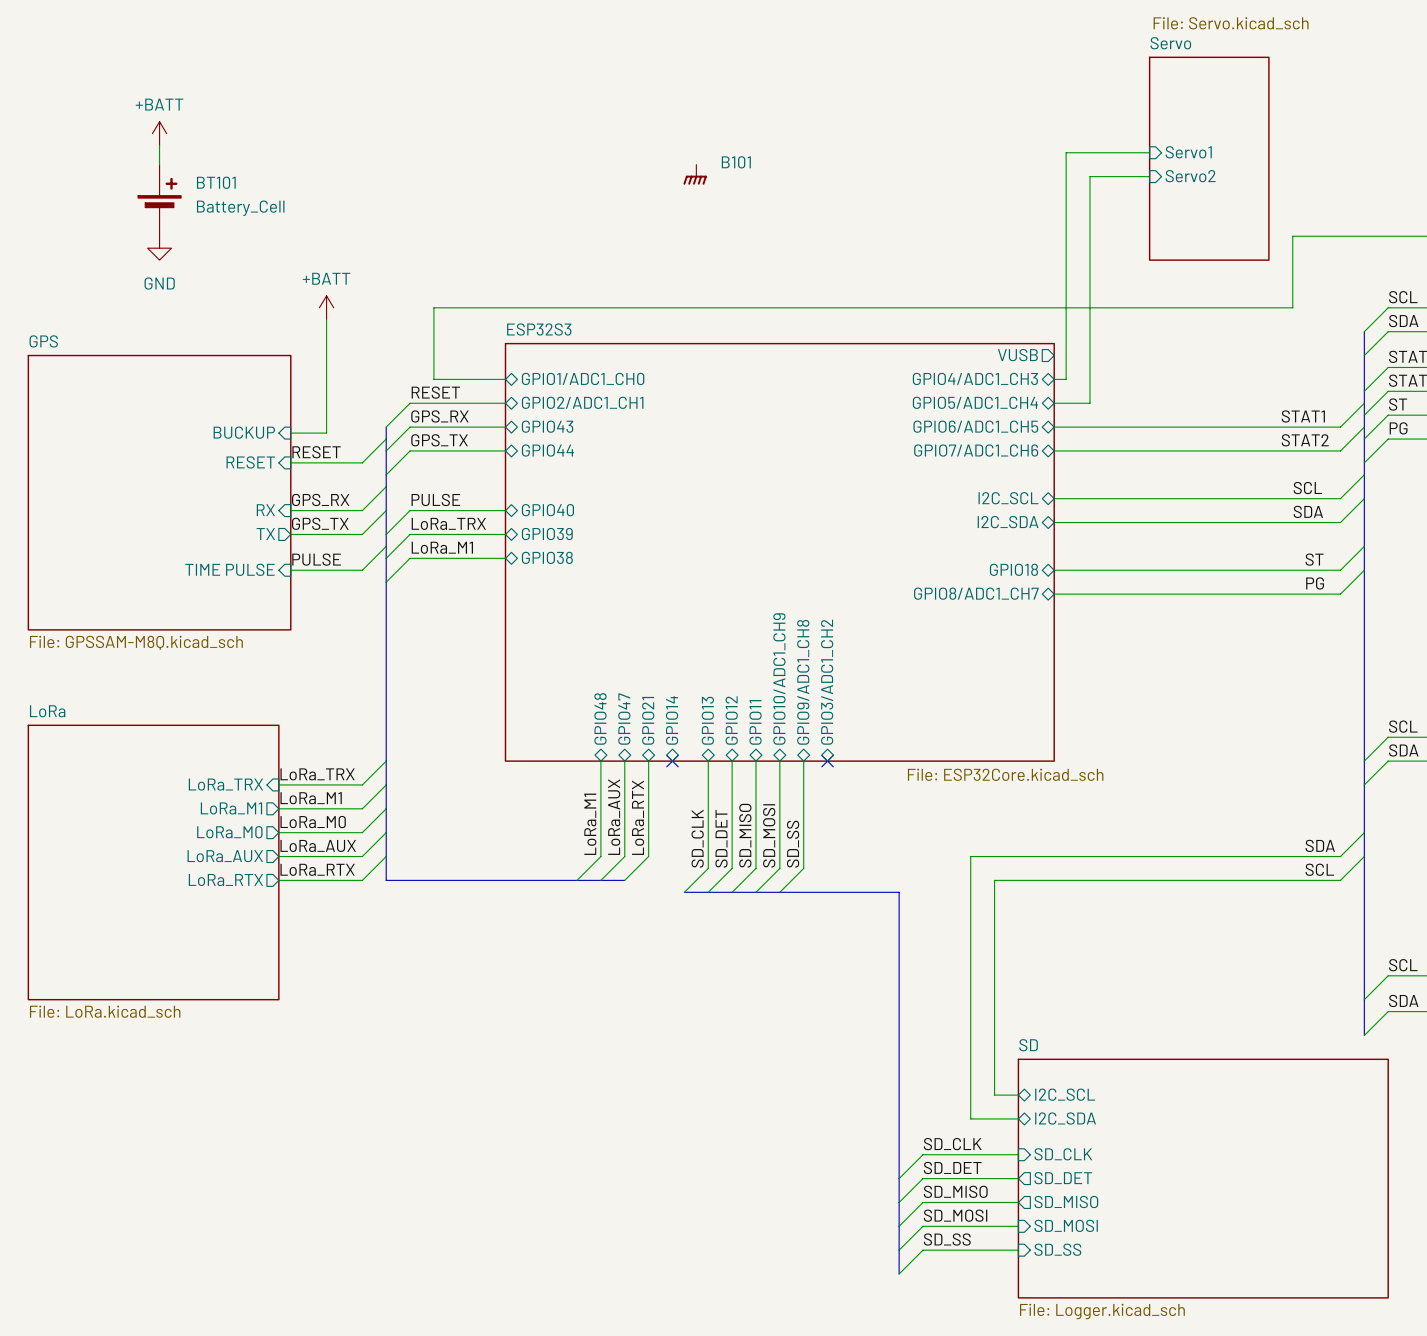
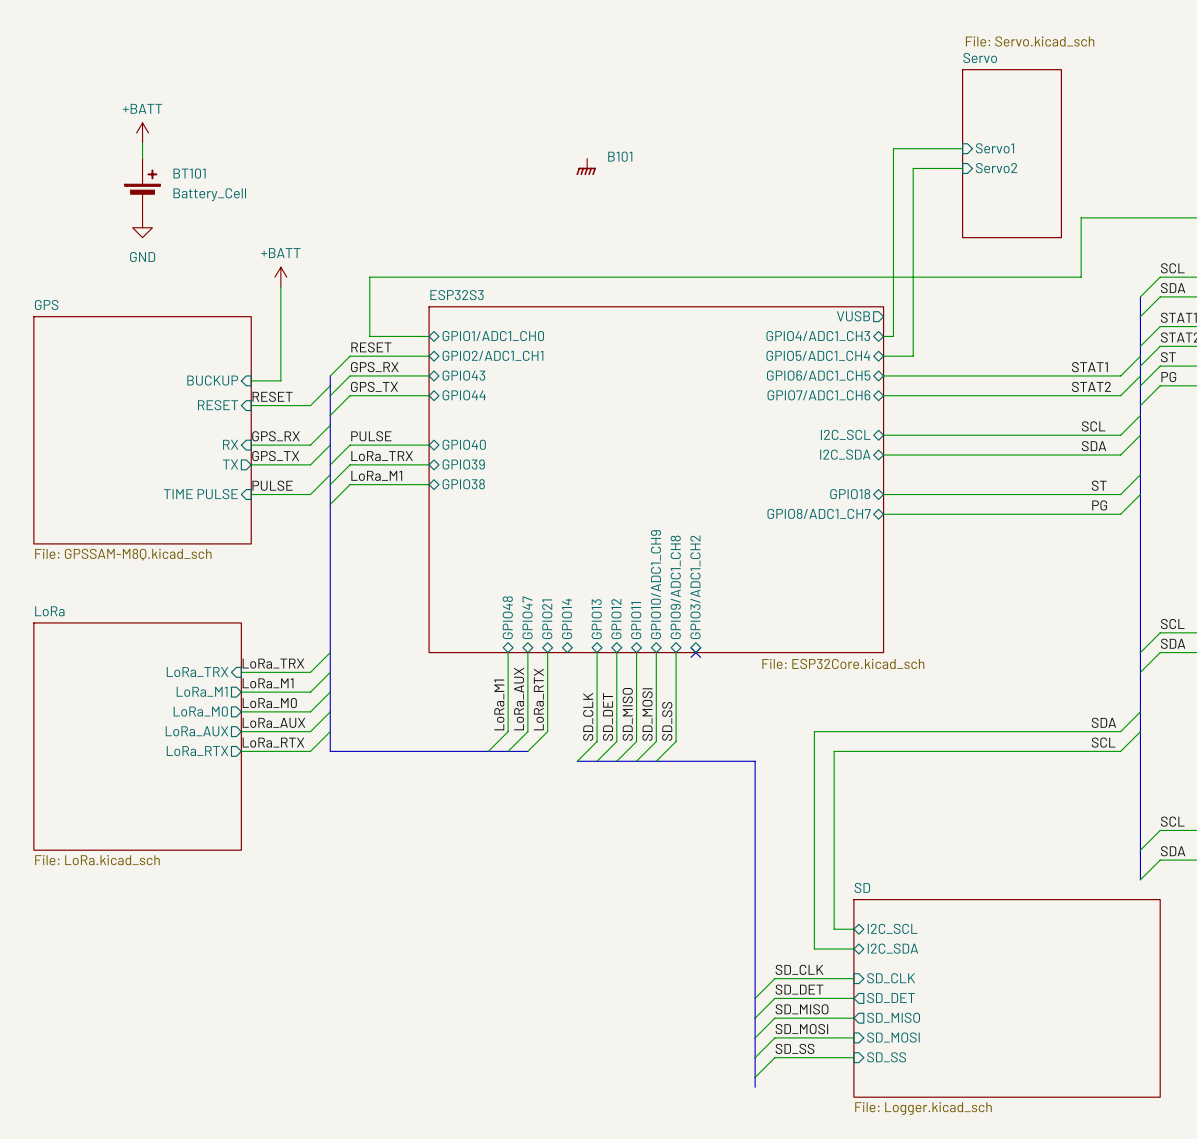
no-connect mark: (672, 761) -> none
bus: none -> (755, 1077) (755, 1087)

